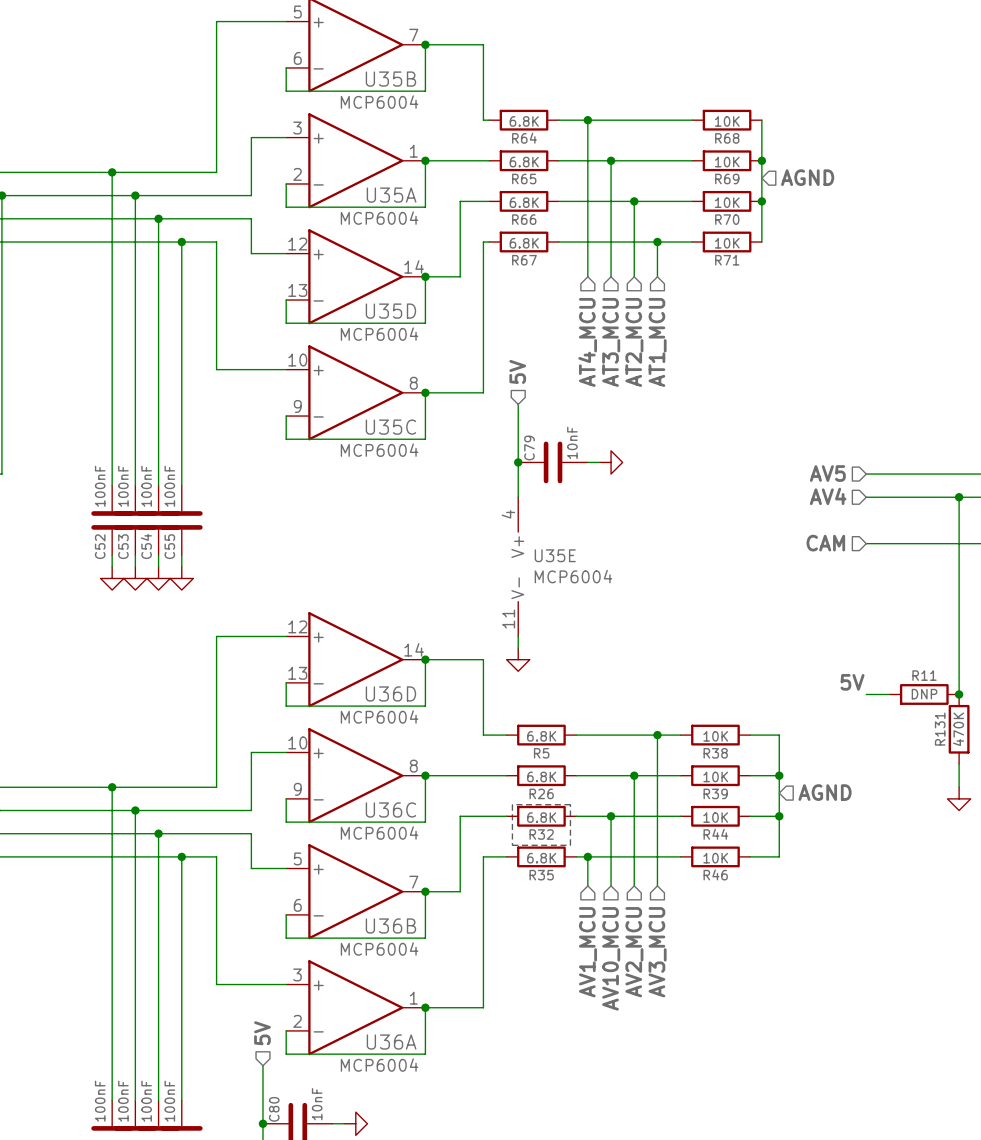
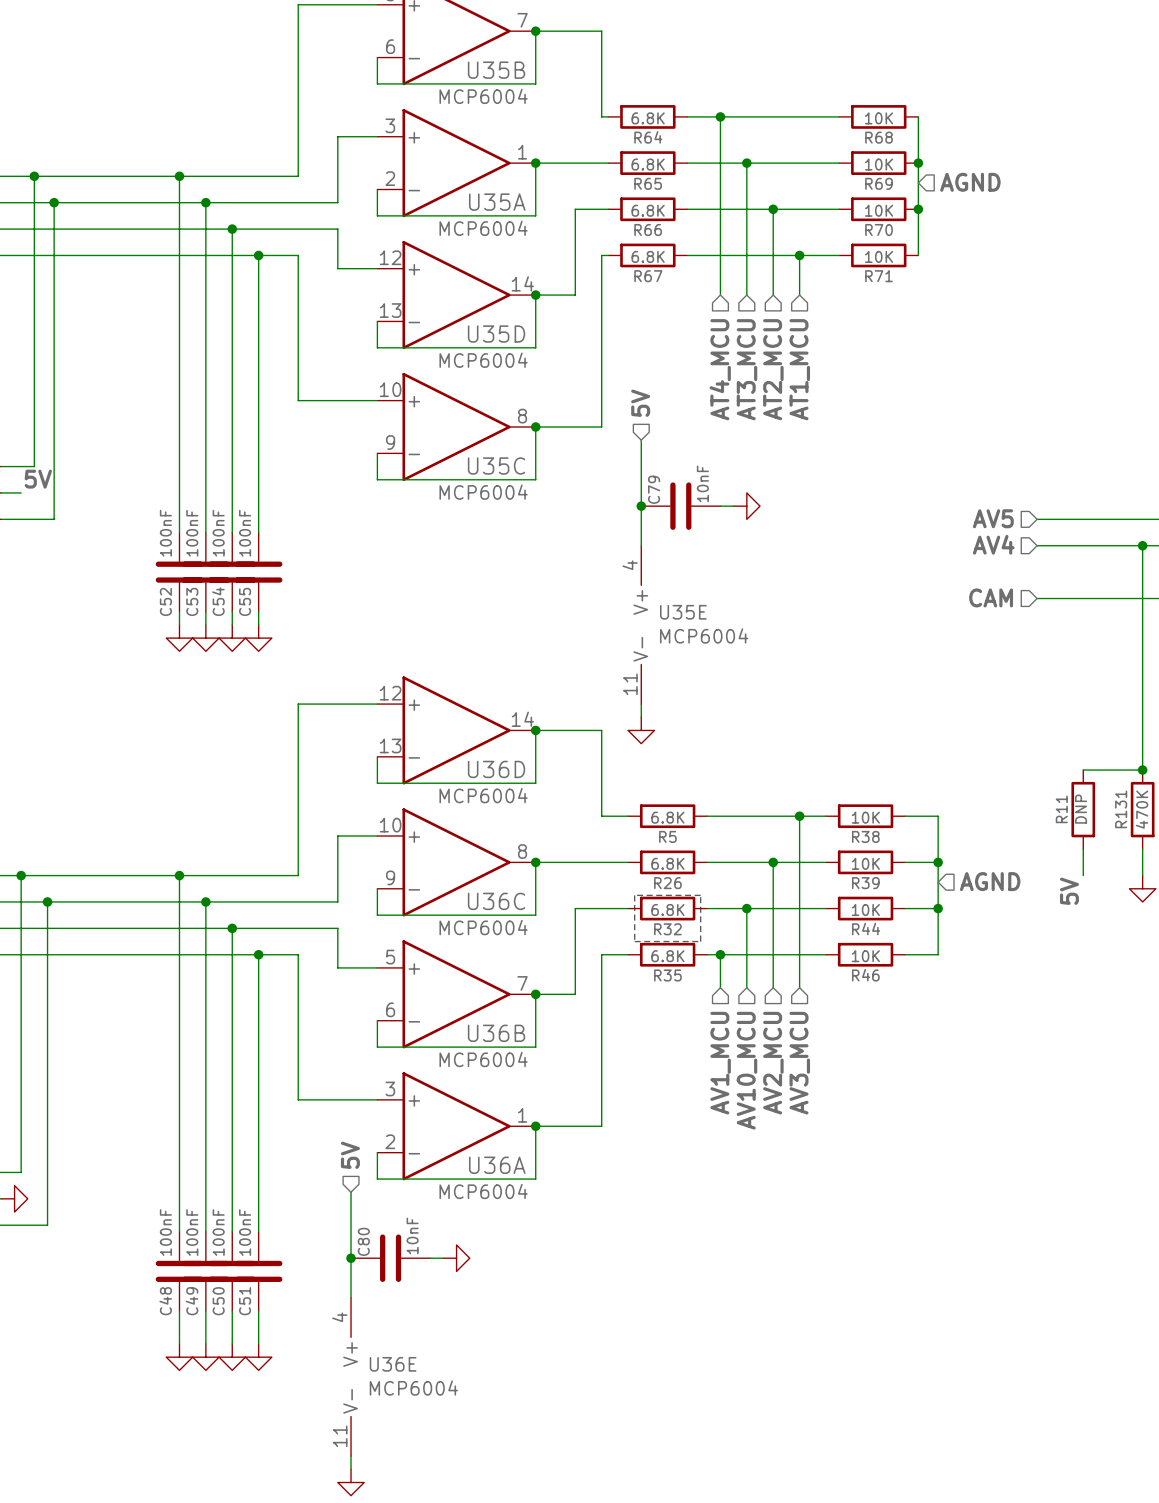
R11 name position: R11 (924, 675) -> R11 (1061, 809)
label: 5V (852, 682) -> none
wire: (866, 694) (889, 694) -> none
wire: none -> (1083, 770) (1142, 770)
R11 rotation: 0° (924, 694) -> 90° clockwise (1083, 809)
wire: none -> (1083, 849) (1083, 875)
label: none -> 5V (1069, 891)

